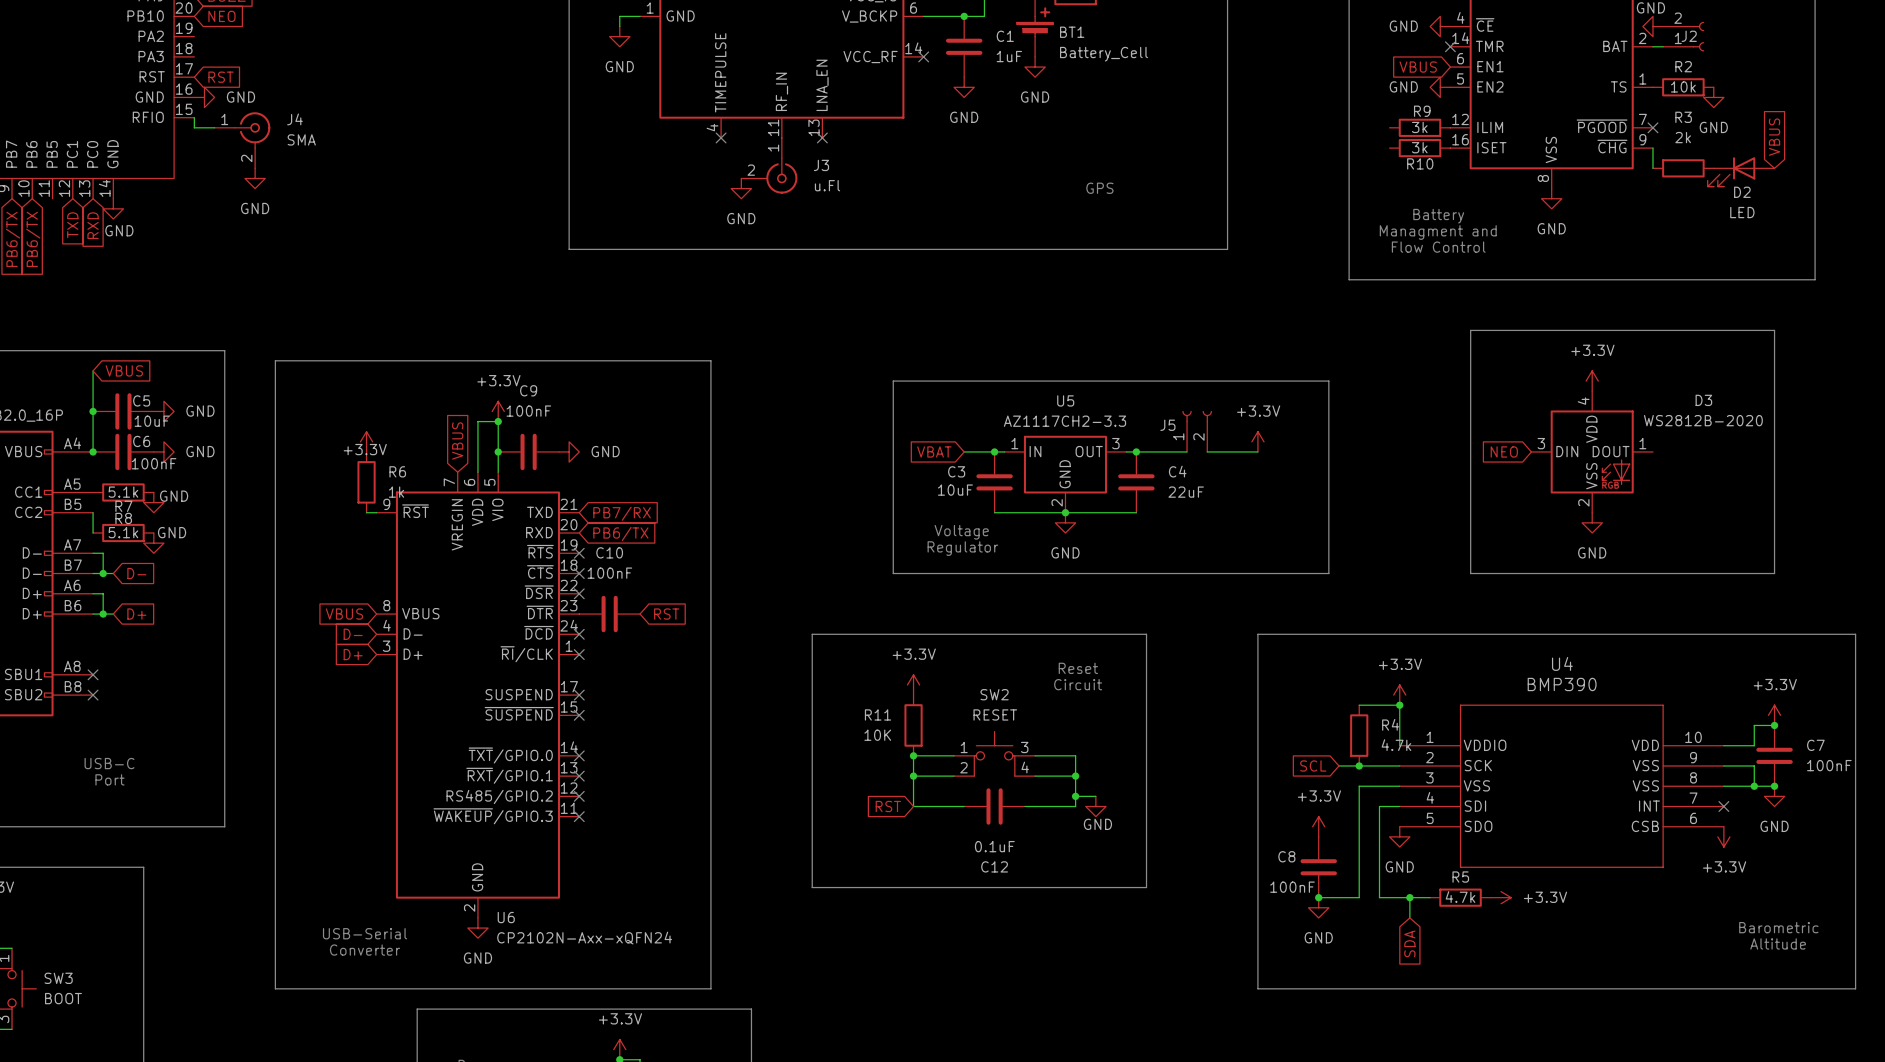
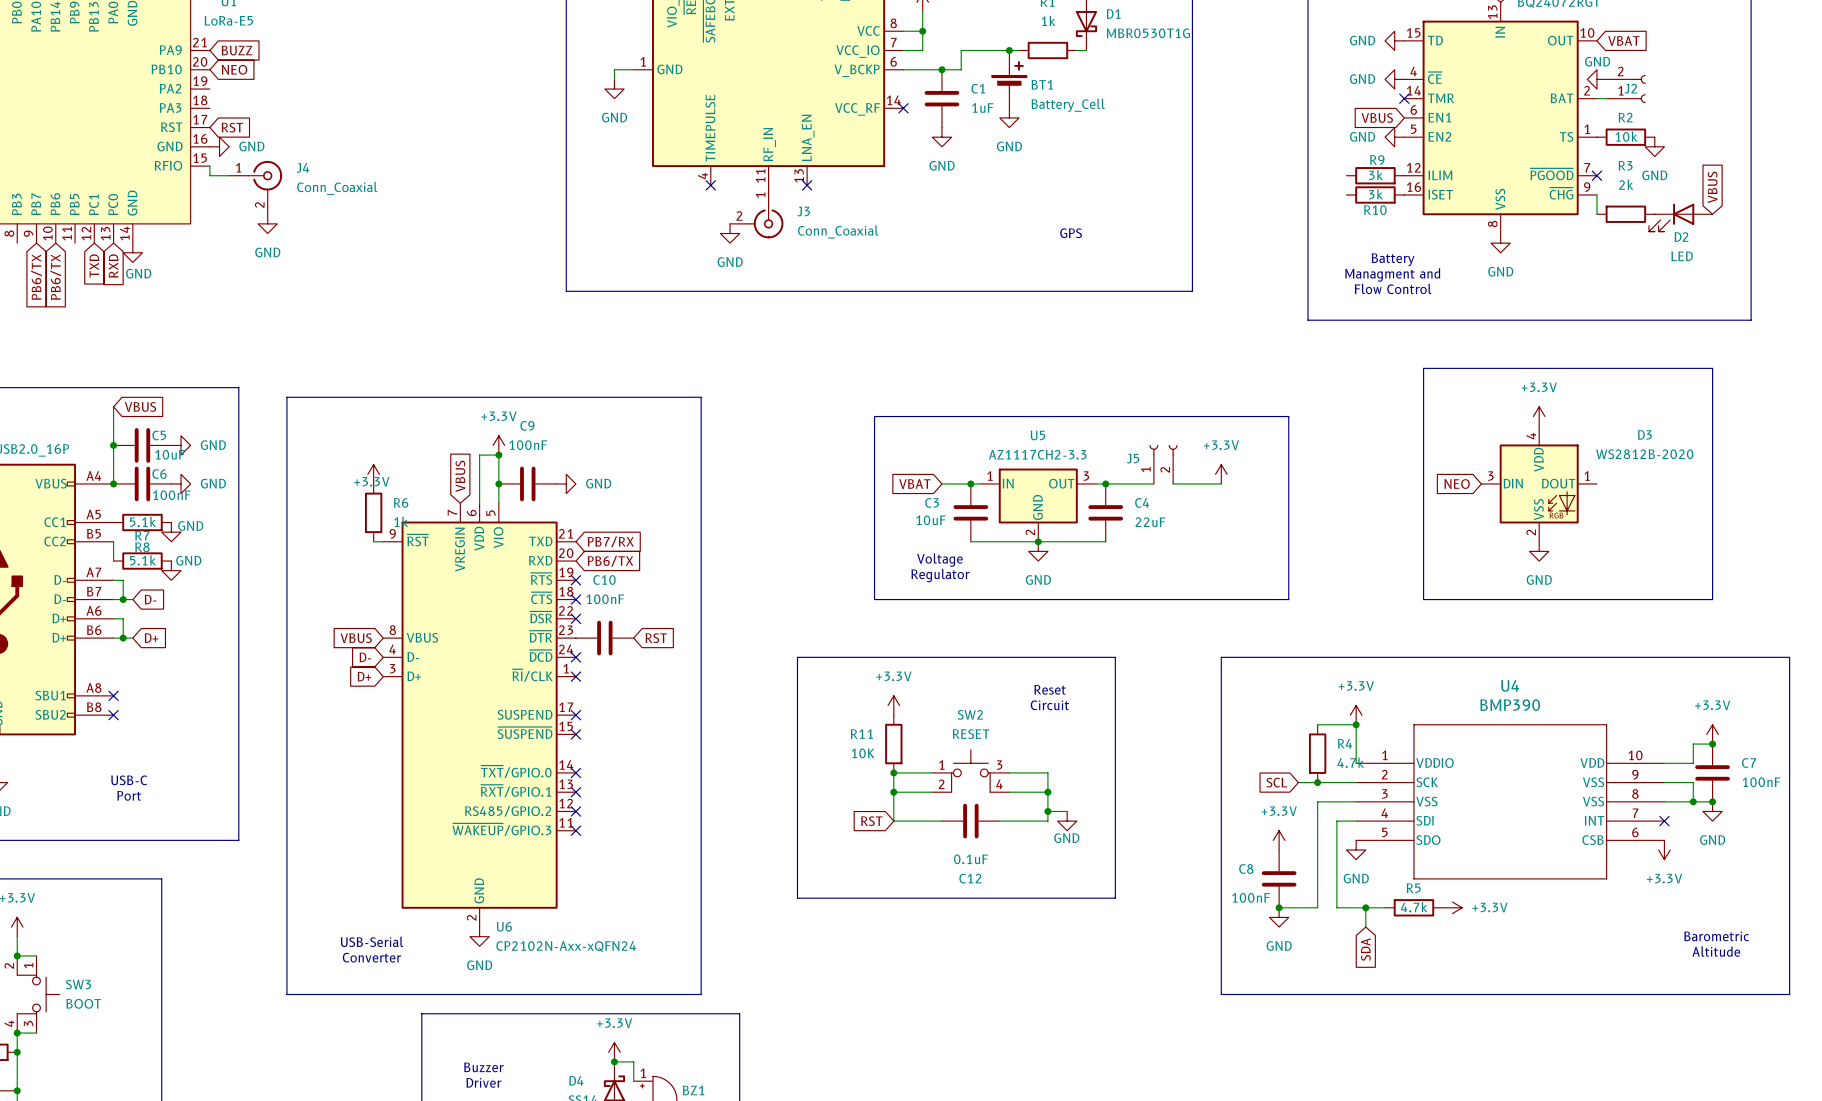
J4 value: SMA (301, 139) -> Conn_Coaxial (337, 188)
J3 value: u.Fl (827, 185) -> Conn_Coaxial (838, 231)

